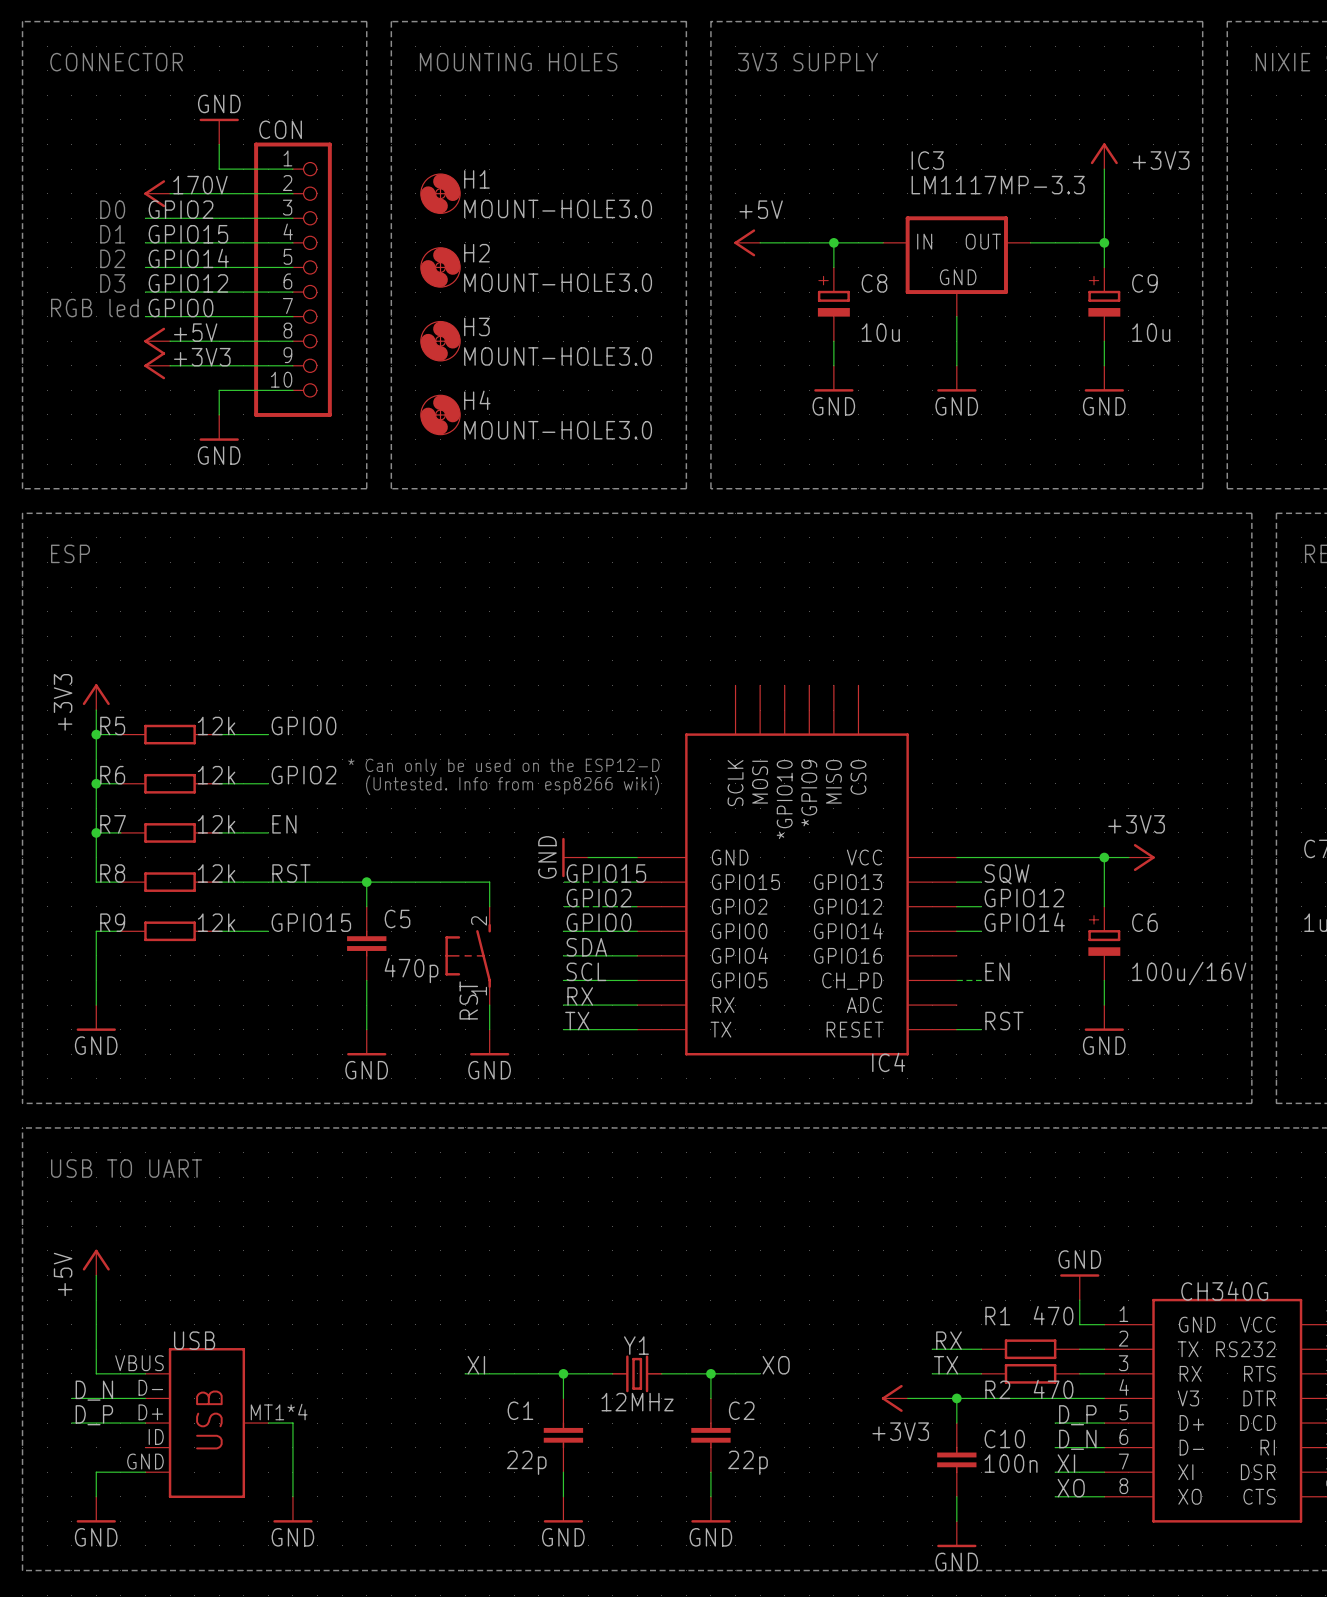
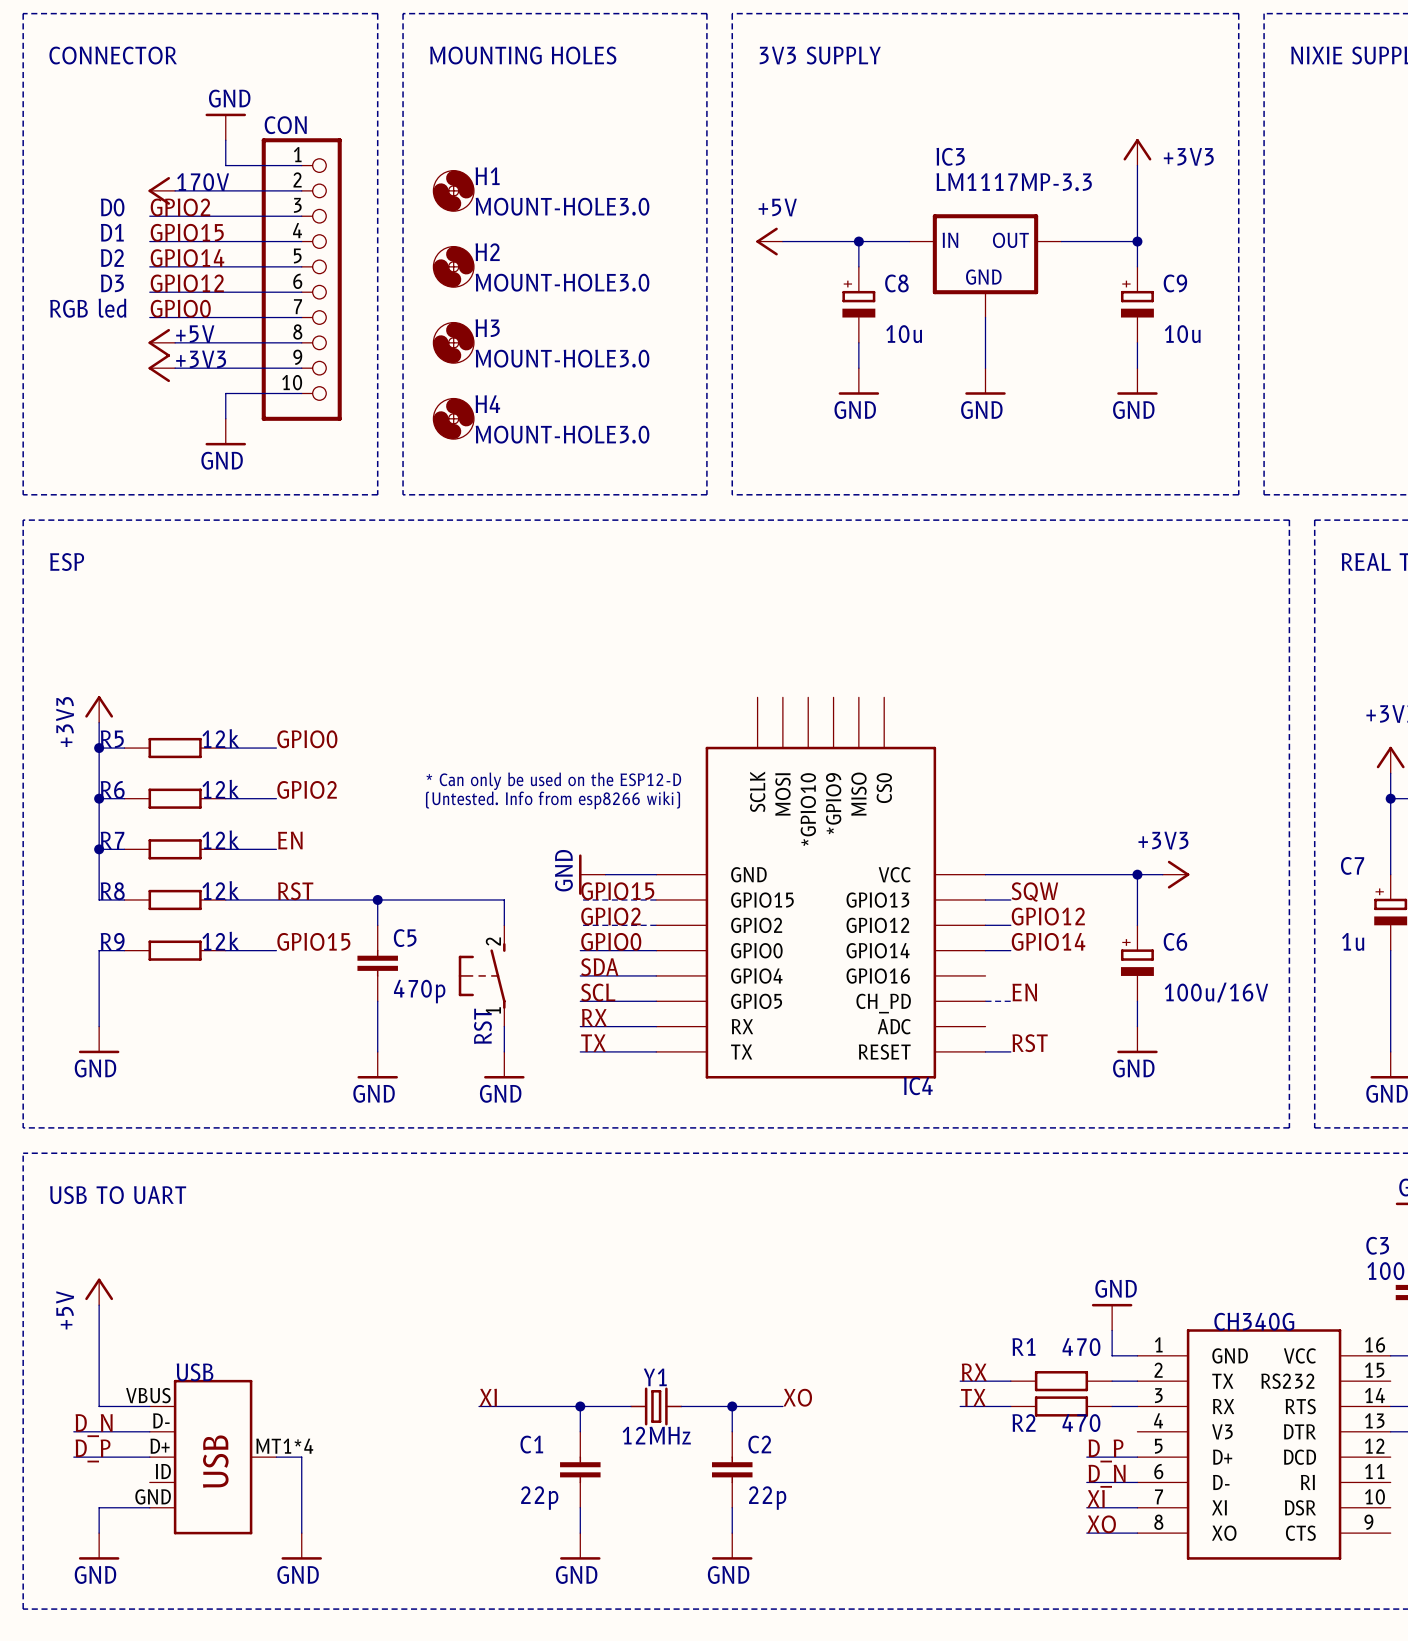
power symbol: +3V3 (894, 1398) -> none
wire: (907, 1398) (1104, 1398) -> none
wire: (956, 1398) (956, 1423) -> none
junction: (956, 1398) -> none
C10: 100n (956, 1459) -> none
wire: (956, 1496) (956, 1521) -> none
power symbol: GND (956, 1534) -> none

